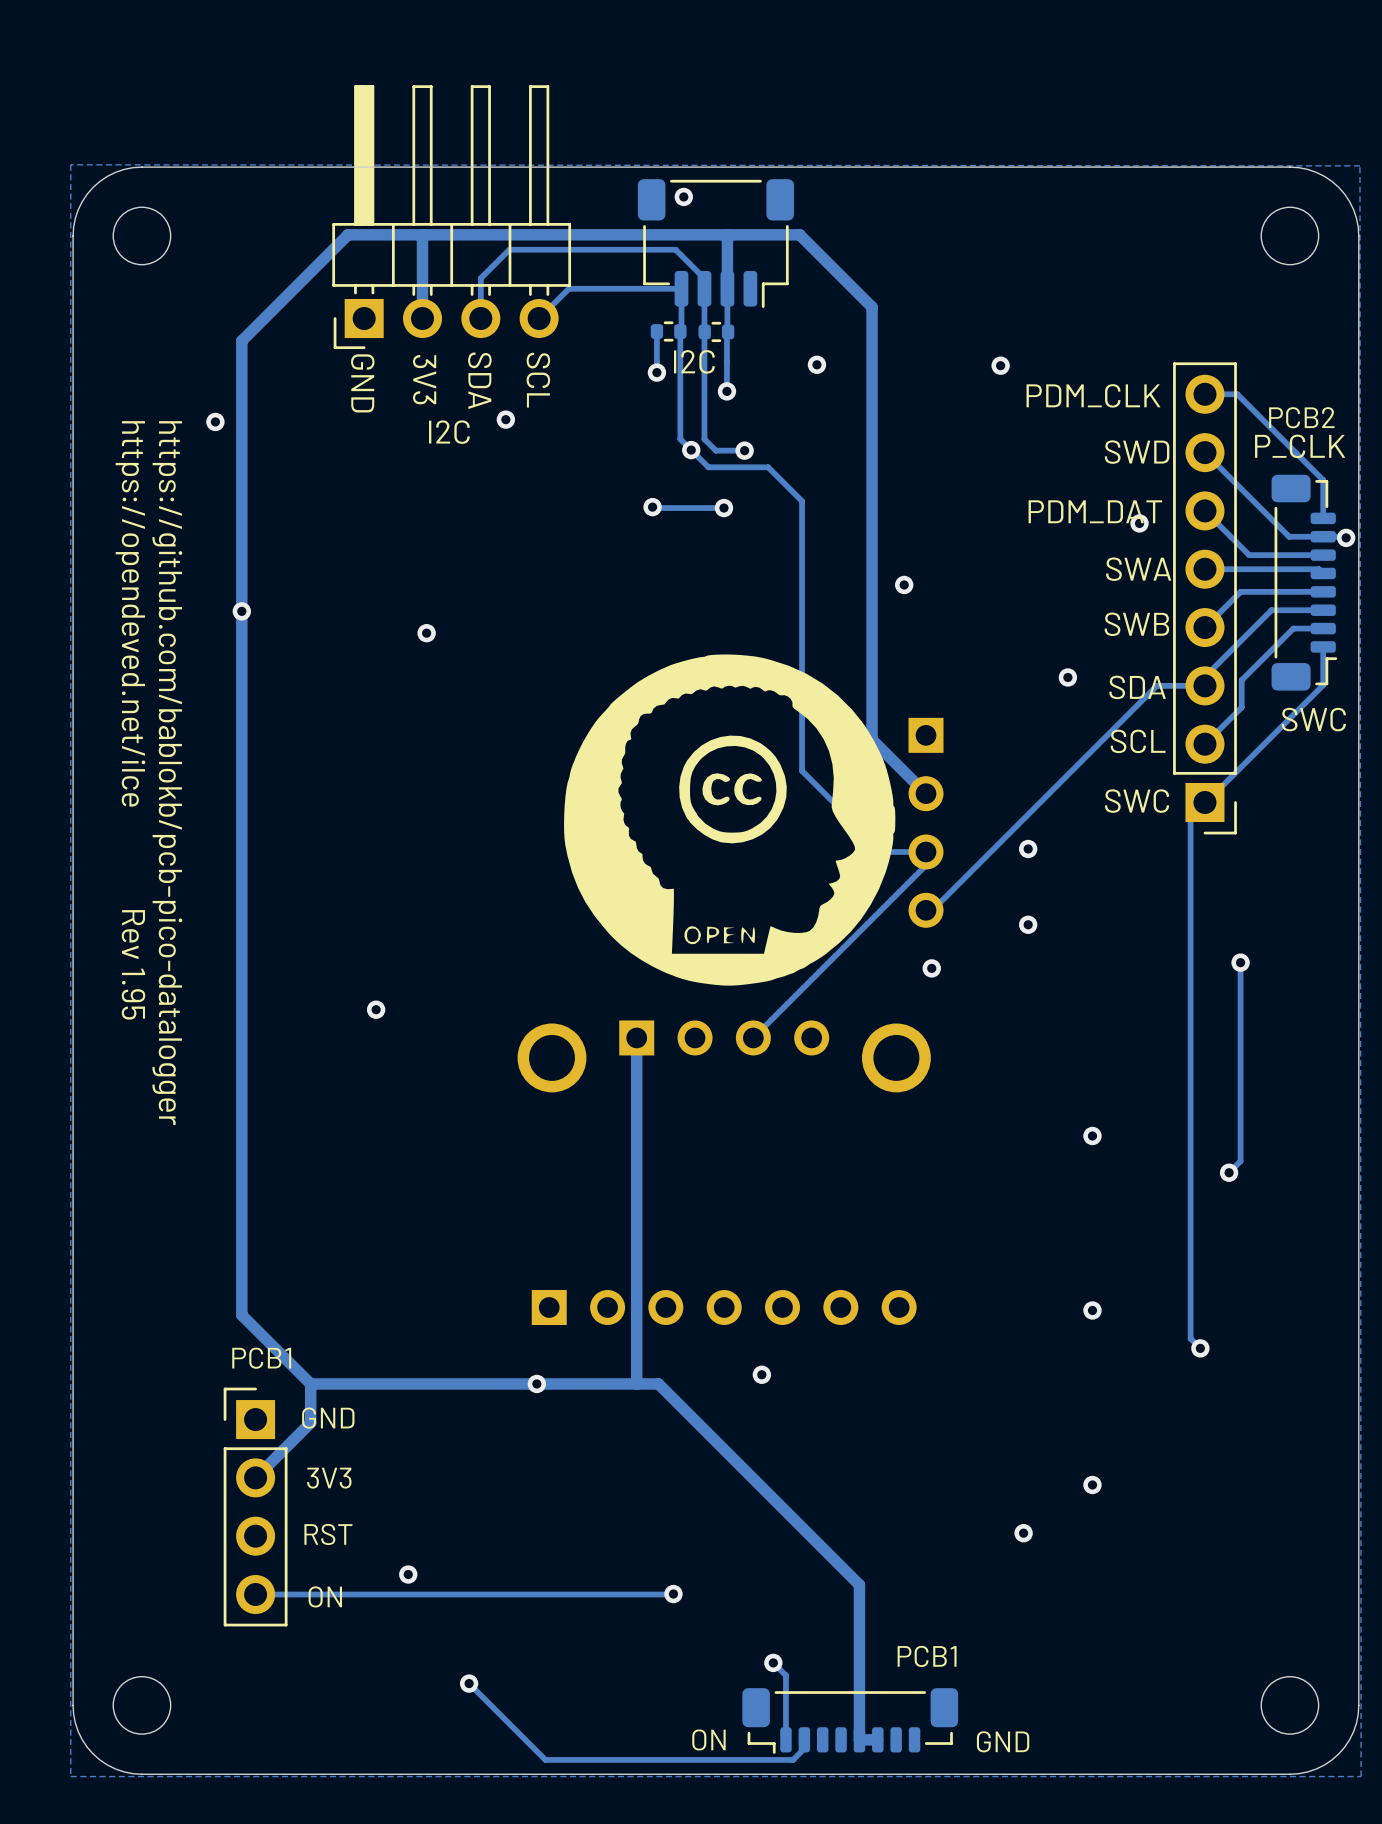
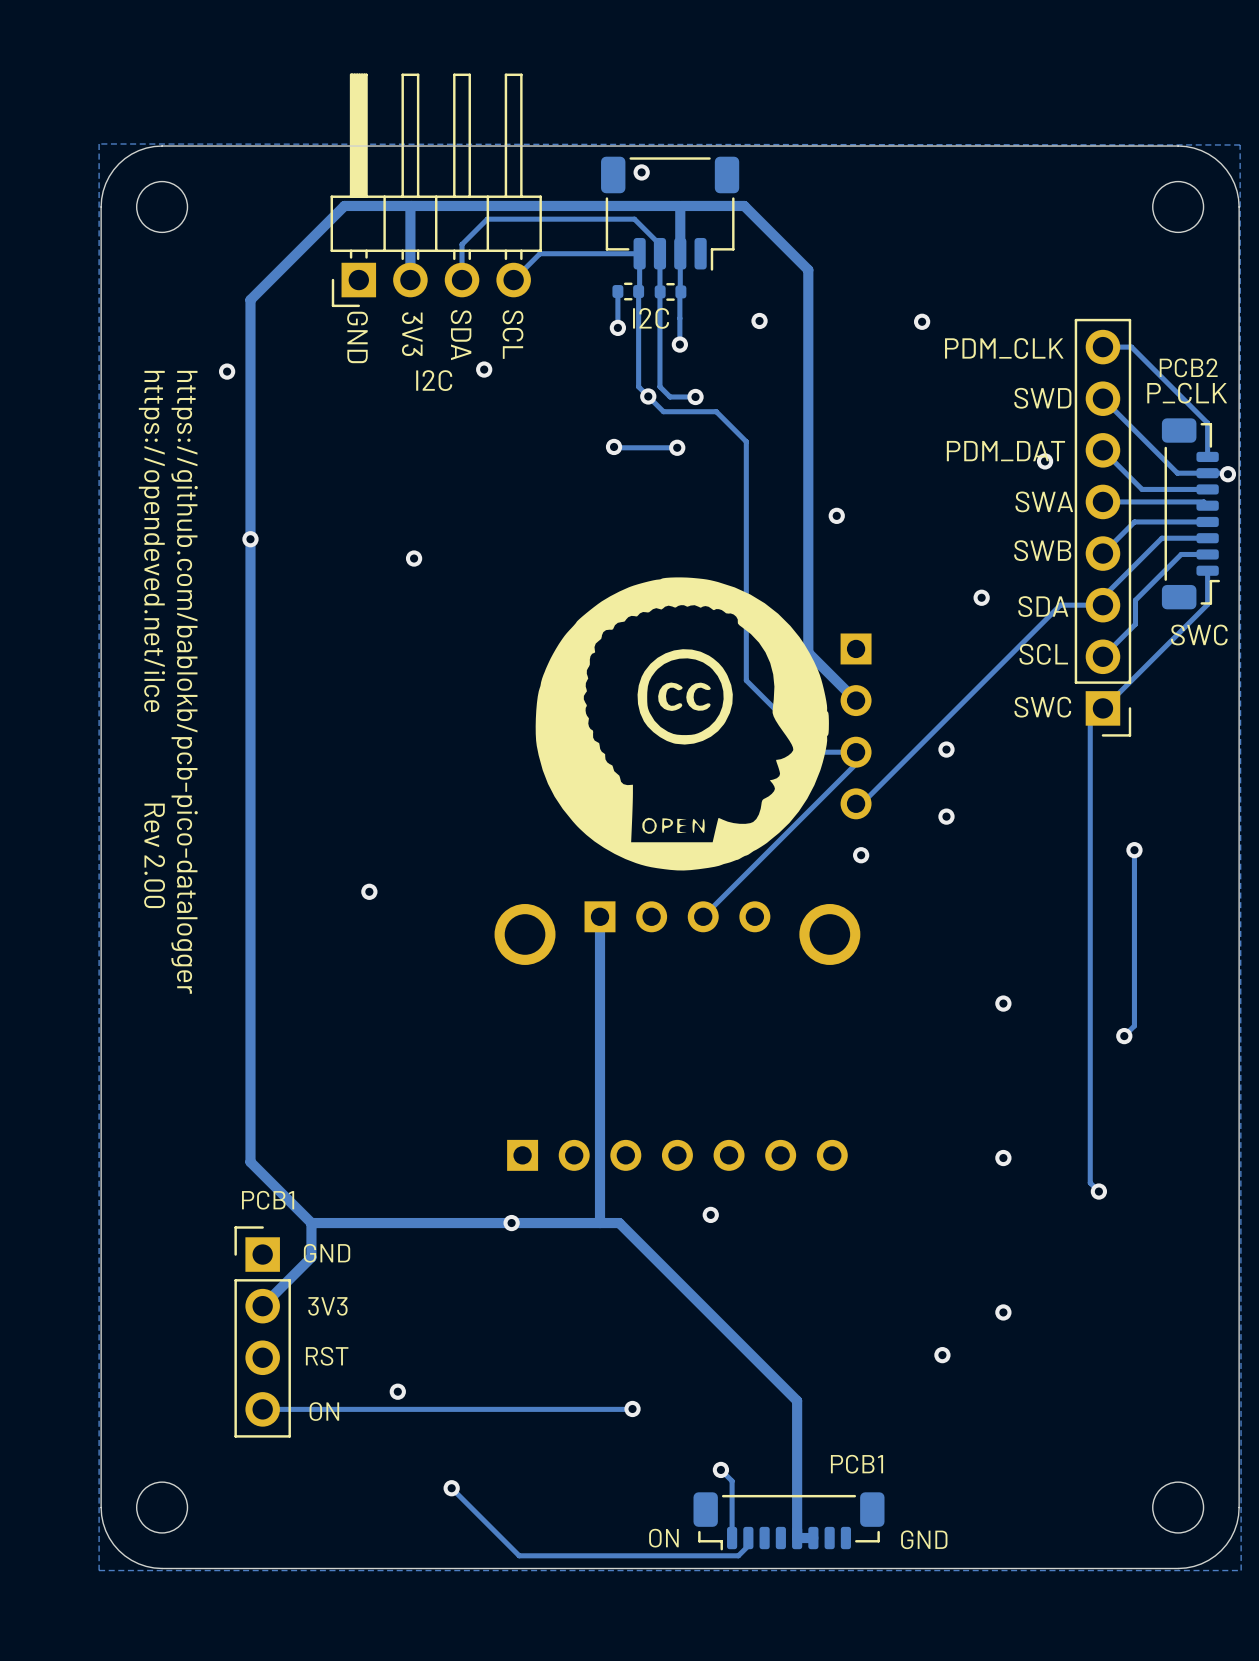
text: https://opendeved.net/ilce Rev 1.95 (130, 720) -> https://opendeved.net/ilce Rev 2.00 (151, 639)

